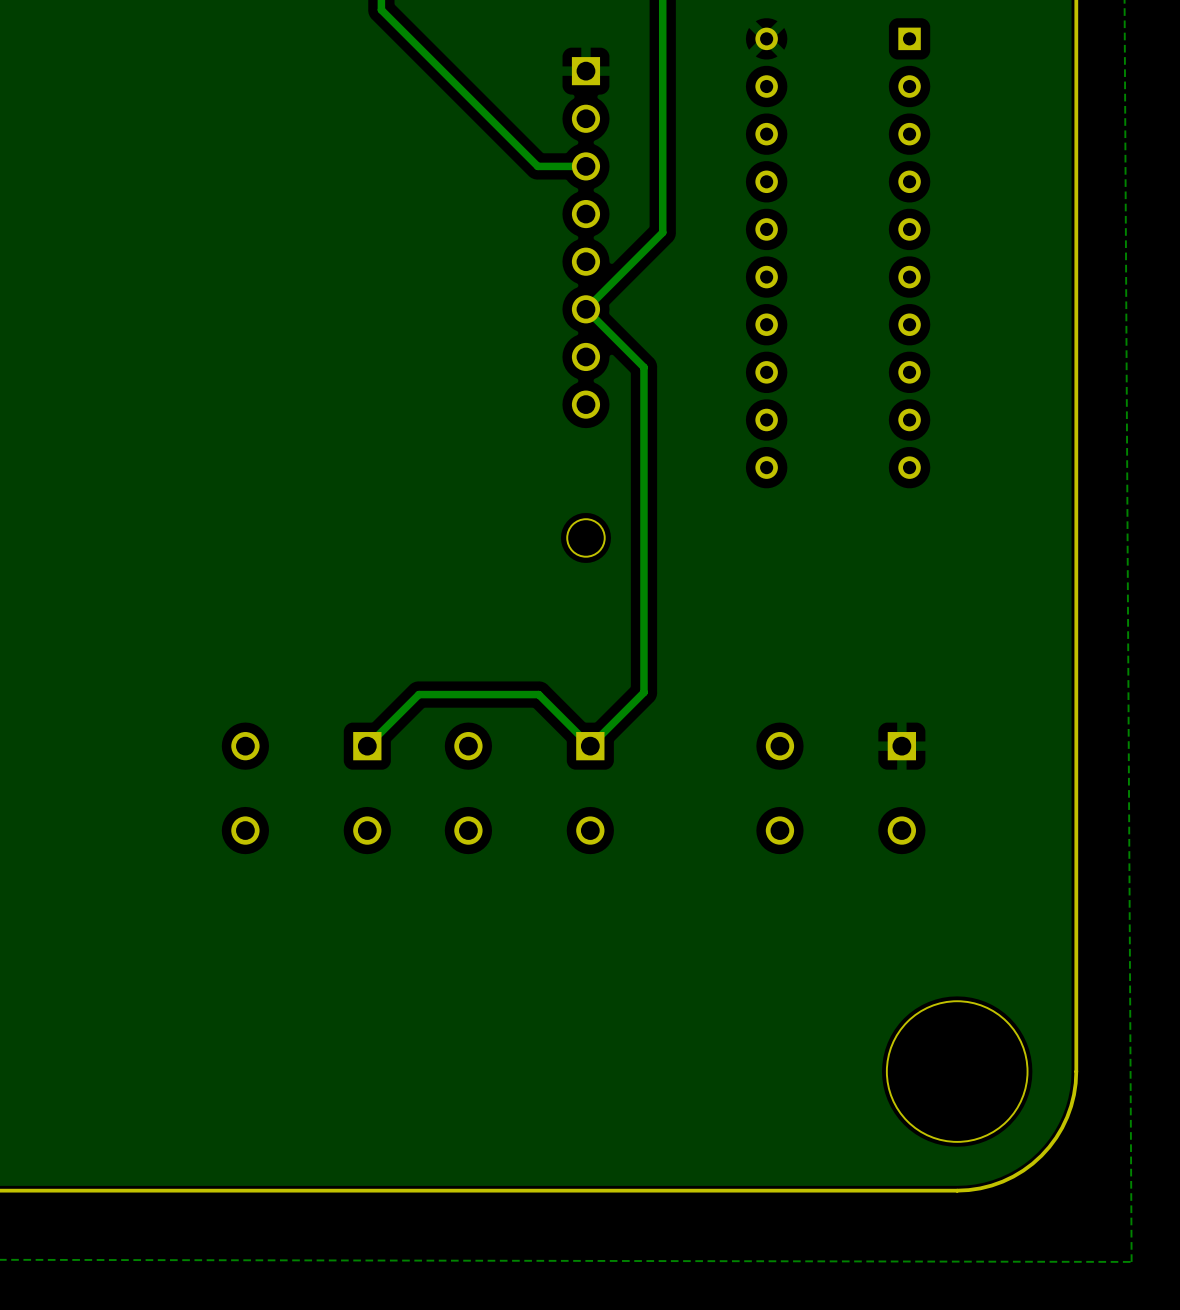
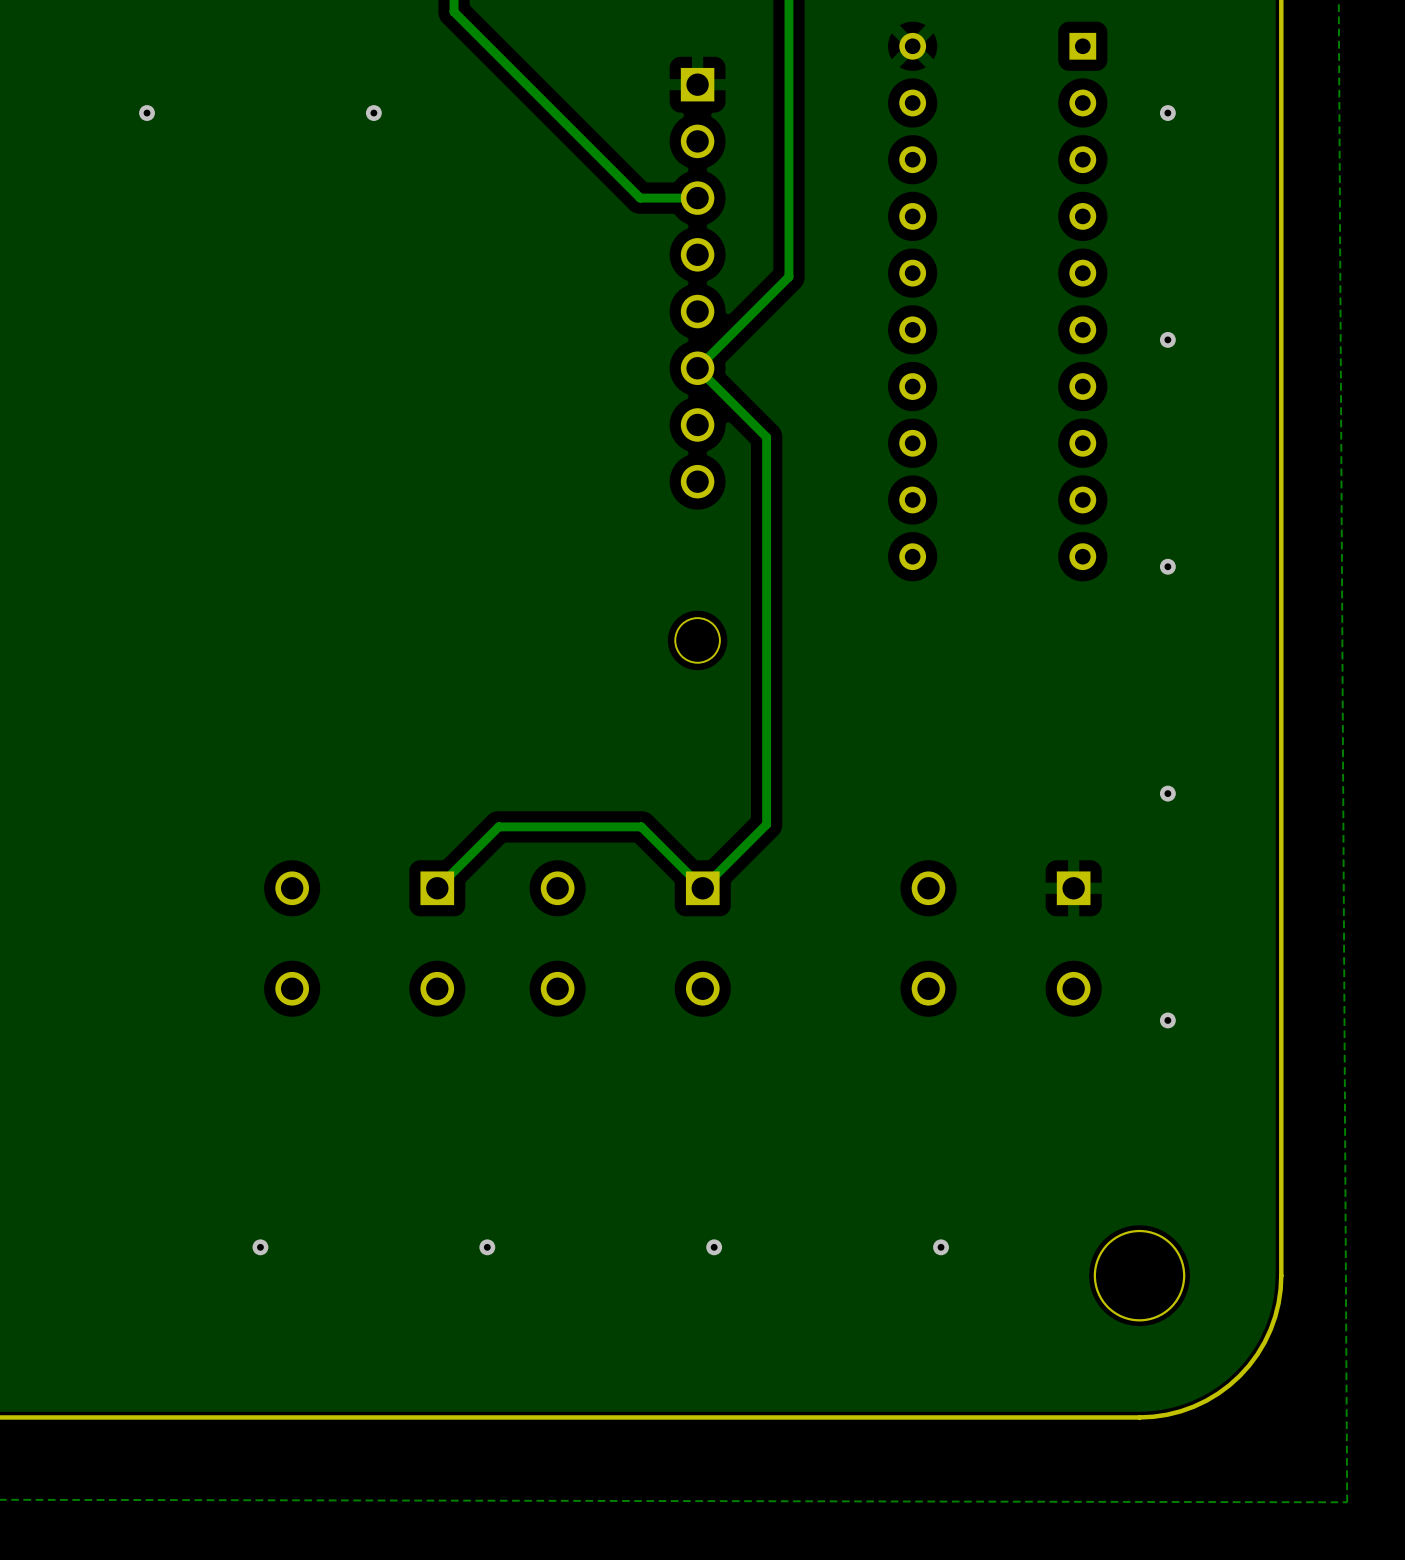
via: none -> (147, 113)
via: none -> (373, 113)
via: none -> (1167, 113)
via: none -> (1167, 339)
via: none -> (1167, 566)
via: none -> (1167, 793)
via: none -> (1167, 1020)
round board edge size: [885, 1000, 1029, 1143] -> [1093, 1229, 1186, 1322]
via: none -> (260, 1247)
via: none -> (487, 1247)
via: none -> (714, 1247)
via: none -> (941, 1247)

